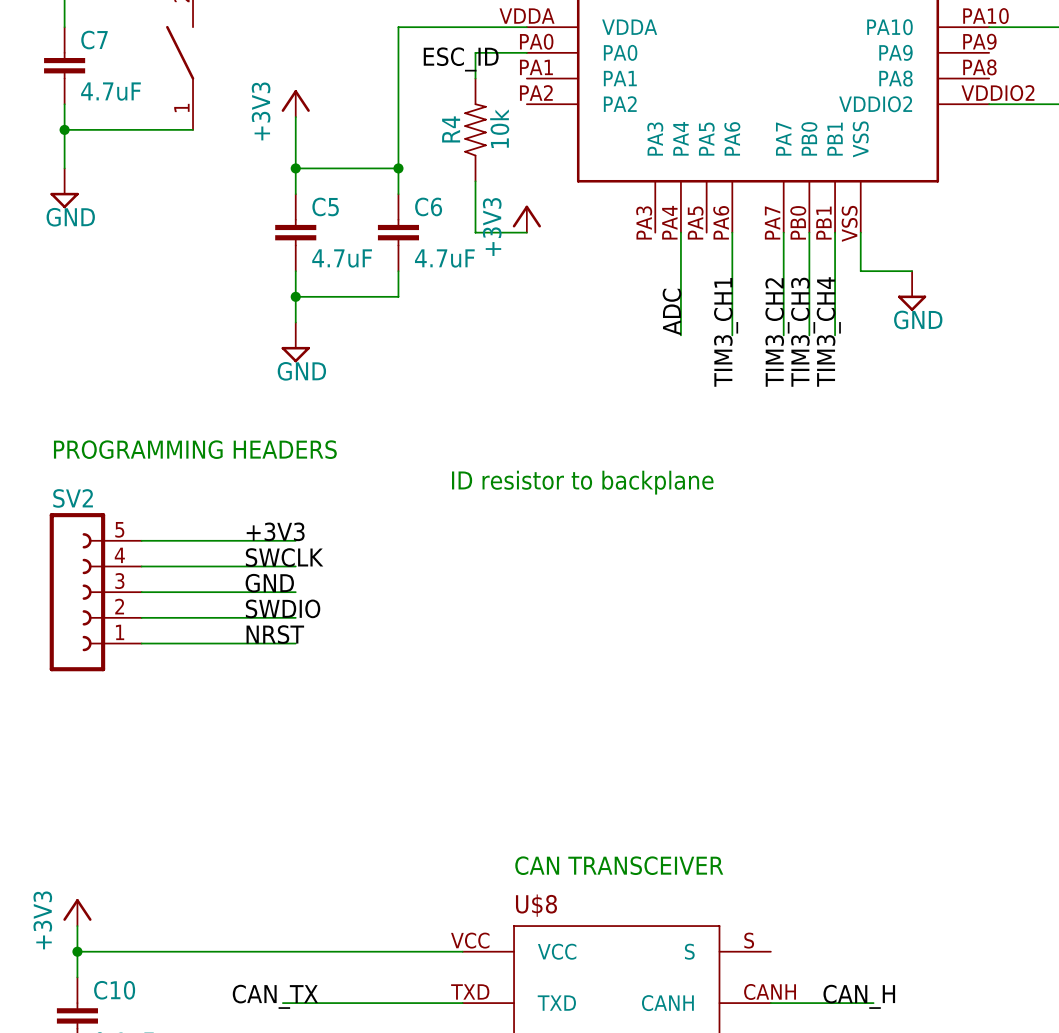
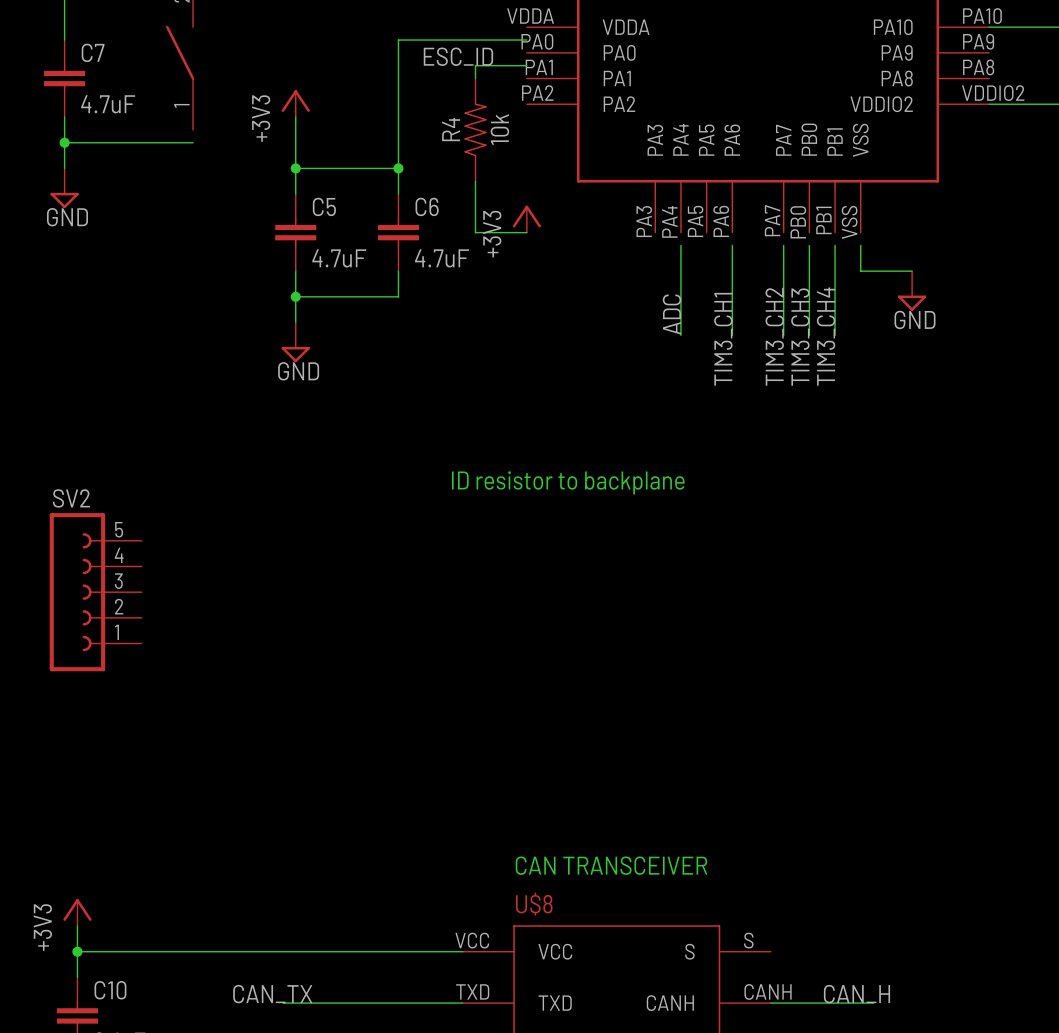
wire: (526, 27) (398, 27) (398, 40) -> (526, 40) (398, 40)
wire: (526, 52) (475, 52) (475, 65) -> (526, 65) (475, 65)
C7 position: (64, 65) -> (64, 78)
wire: (64, 129) (193, 129) -> (64, 142) (193, 142)
junction position: (64, 129) -> (64, 142)
wire: (680, 232) (680, 245) -> none
wire: (732, 232) (732, 245) -> none
wire: (783, 232) (783, 245) -> none
wire: (809, 232) (809, 245) -> none
wire: (835, 232) (835, 245) -> none
wire: (860, 232) (860, 245) -> none
text: PROGRAMMING HEADERS (195, 449) -> none
label: +3V3 (275, 531) -> none
wire: (141, 540) (295, 540) -> none
label: SWCLK (284, 557) -> none
wire: (141, 566) (295, 566) -> none
label: GND (269, 583) -> none
wire: (141, 592) (295, 592) -> none
label: SWDIO (283, 608) -> none
wire: (141, 617) (295, 617) -> none
label: NRST (275, 634) -> none
wire: (141, 643) (295, 643) -> none

